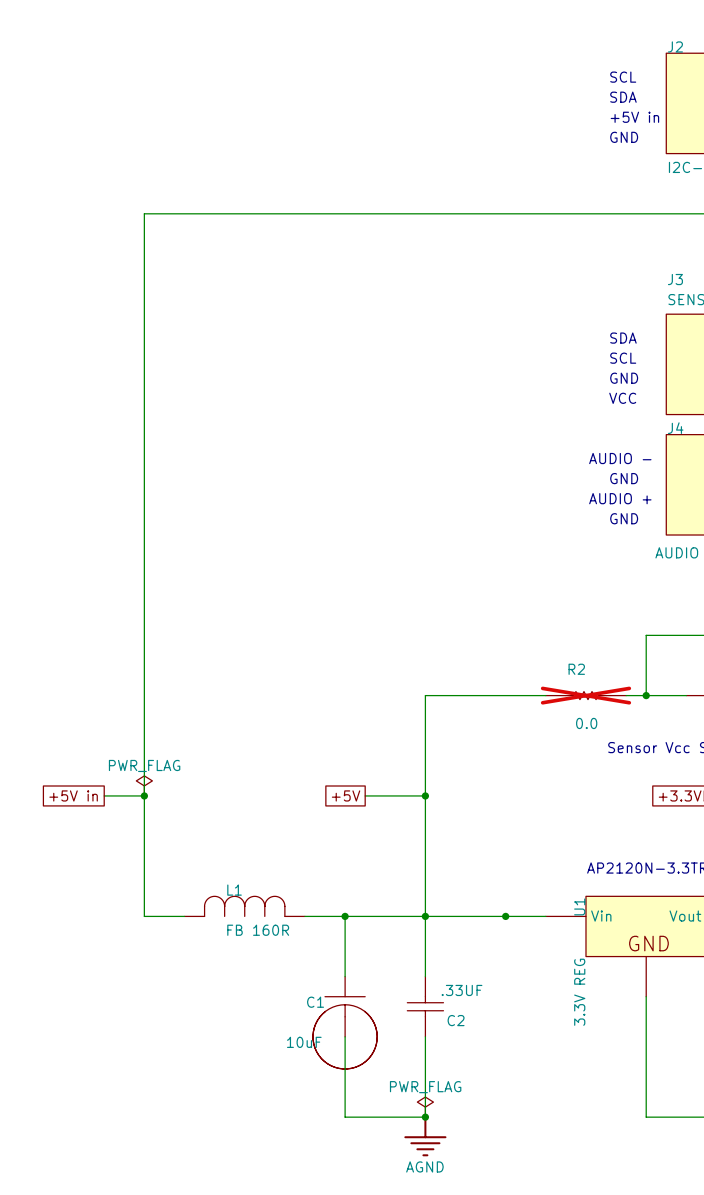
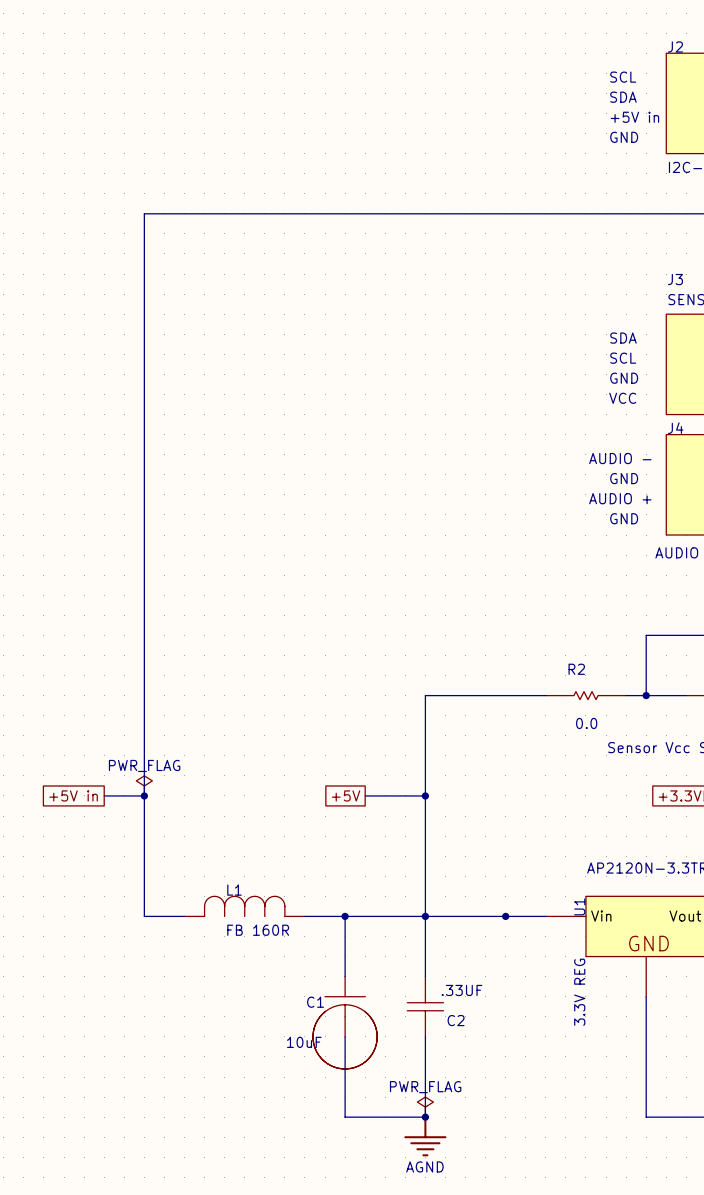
R2 do-not-place cross: (585, 695) -> none

